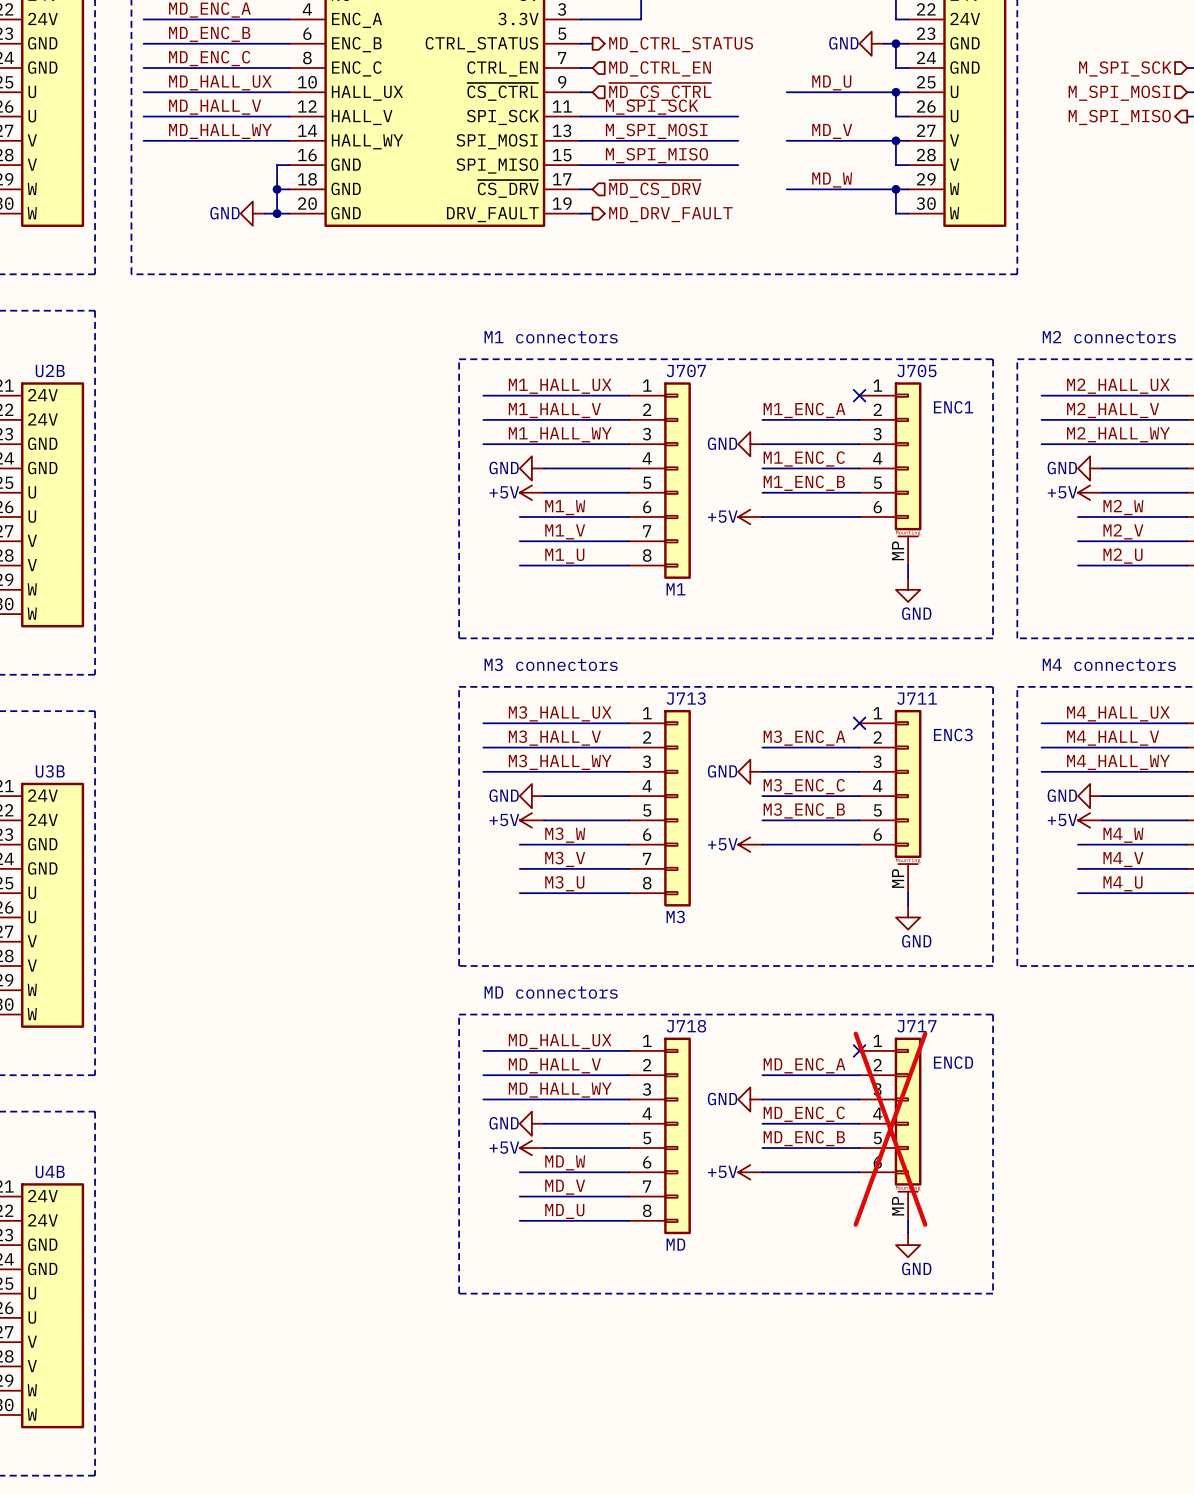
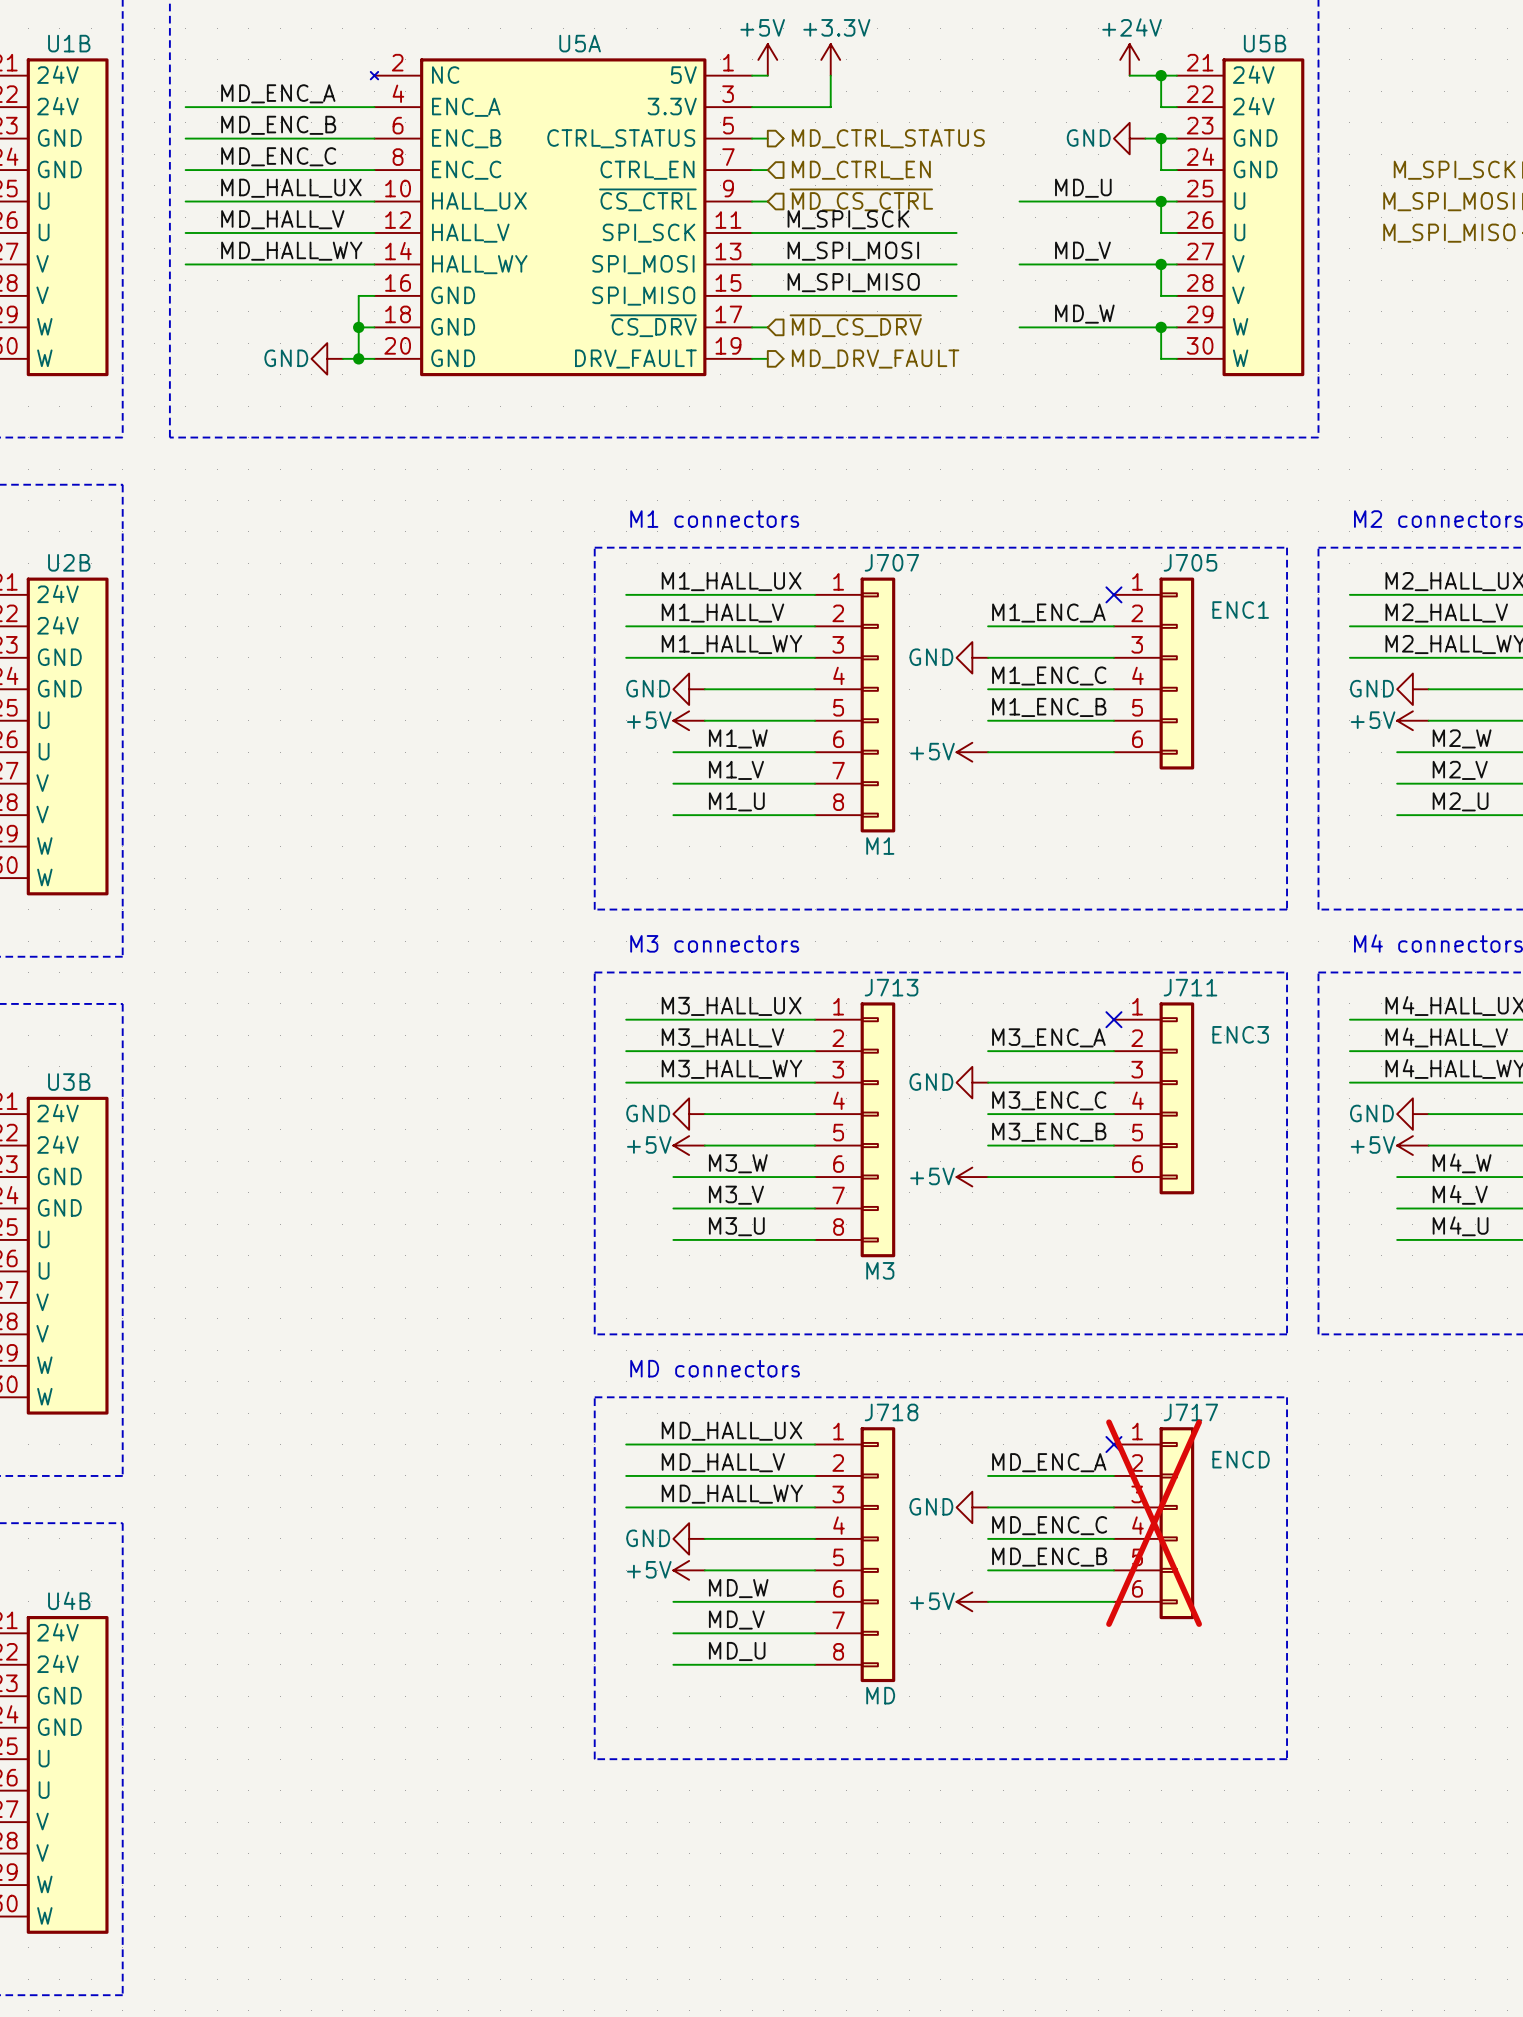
J705 symbol: [859, 382, 922, 566] -> [1113, 577, 1195, 770]
wire: (908, 565) (908, 577) -> none
power symbol: GND (908, 589) -> none
J711 symbol: [859, 709, 922, 894] -> [1113, 1002, 1195, 1195]
wire: (908, 893) (908, 905) -> none
power symbol: GND (908, 917) -> none
J717 symbol: [859, 1037, 922, 1221] -> [1113, 1427, 1195, 1620]
wire: (908, 1220) (908, 1232) -> none
power symbol: GND (908, 1245) -> none

